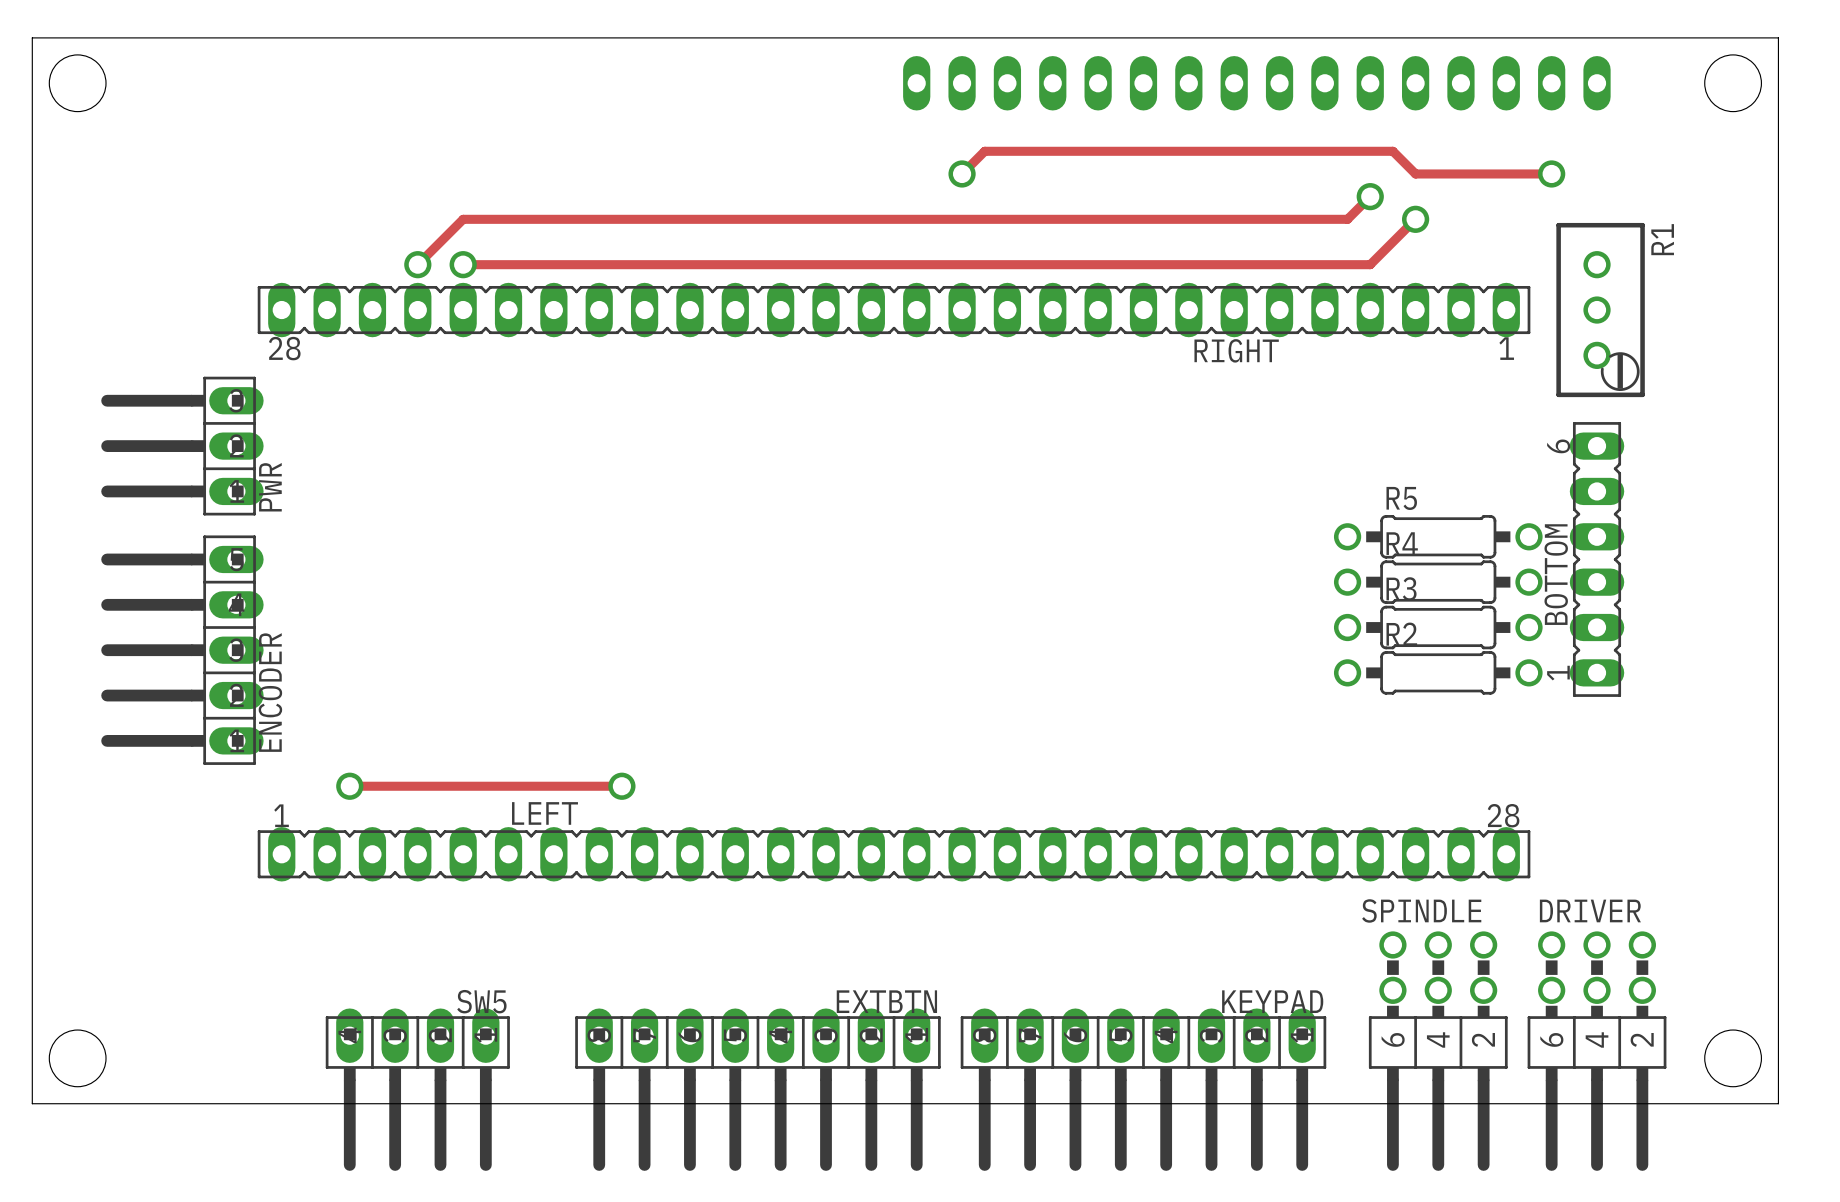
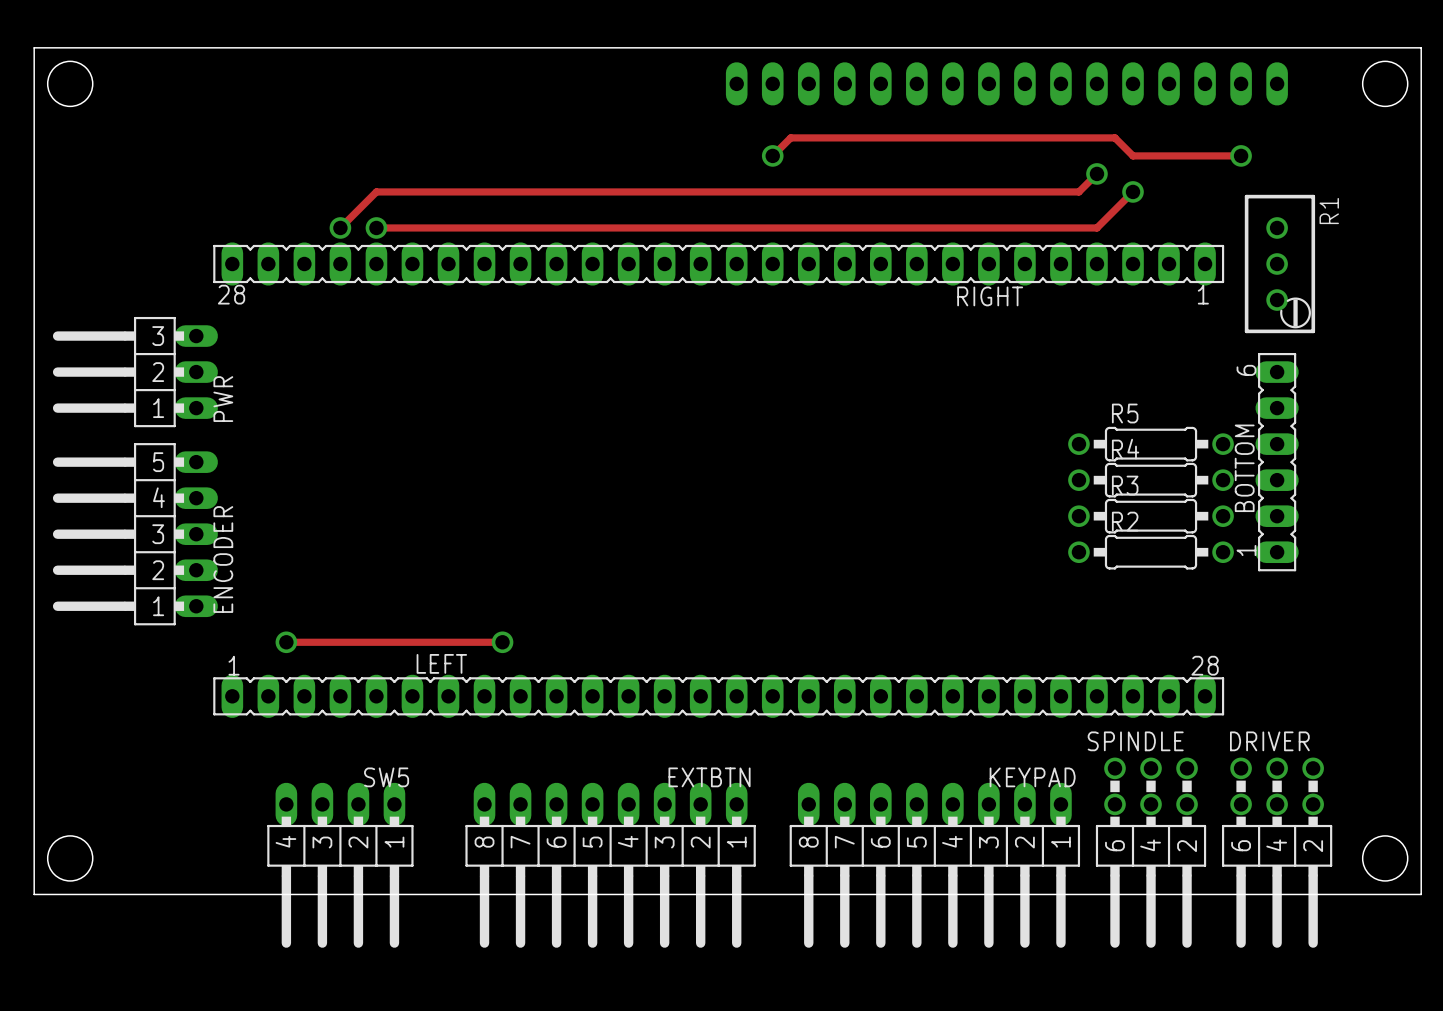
PWR: none -> (135, 372)
PWR: (182, 446) -> none
ENCODER: none -> (135, 534)
ENCODER: (182, 650) -> none
SW5 footprint: [325, 1008, 510, 1171] -> [267, 782, 414, 948]
EXTBTN: none -> (610, 865)
KEYPAD: none -> (934, 865)
EXTBTN: (757, 1089) -> none
KEYPAD: (1143, 1089) -> none

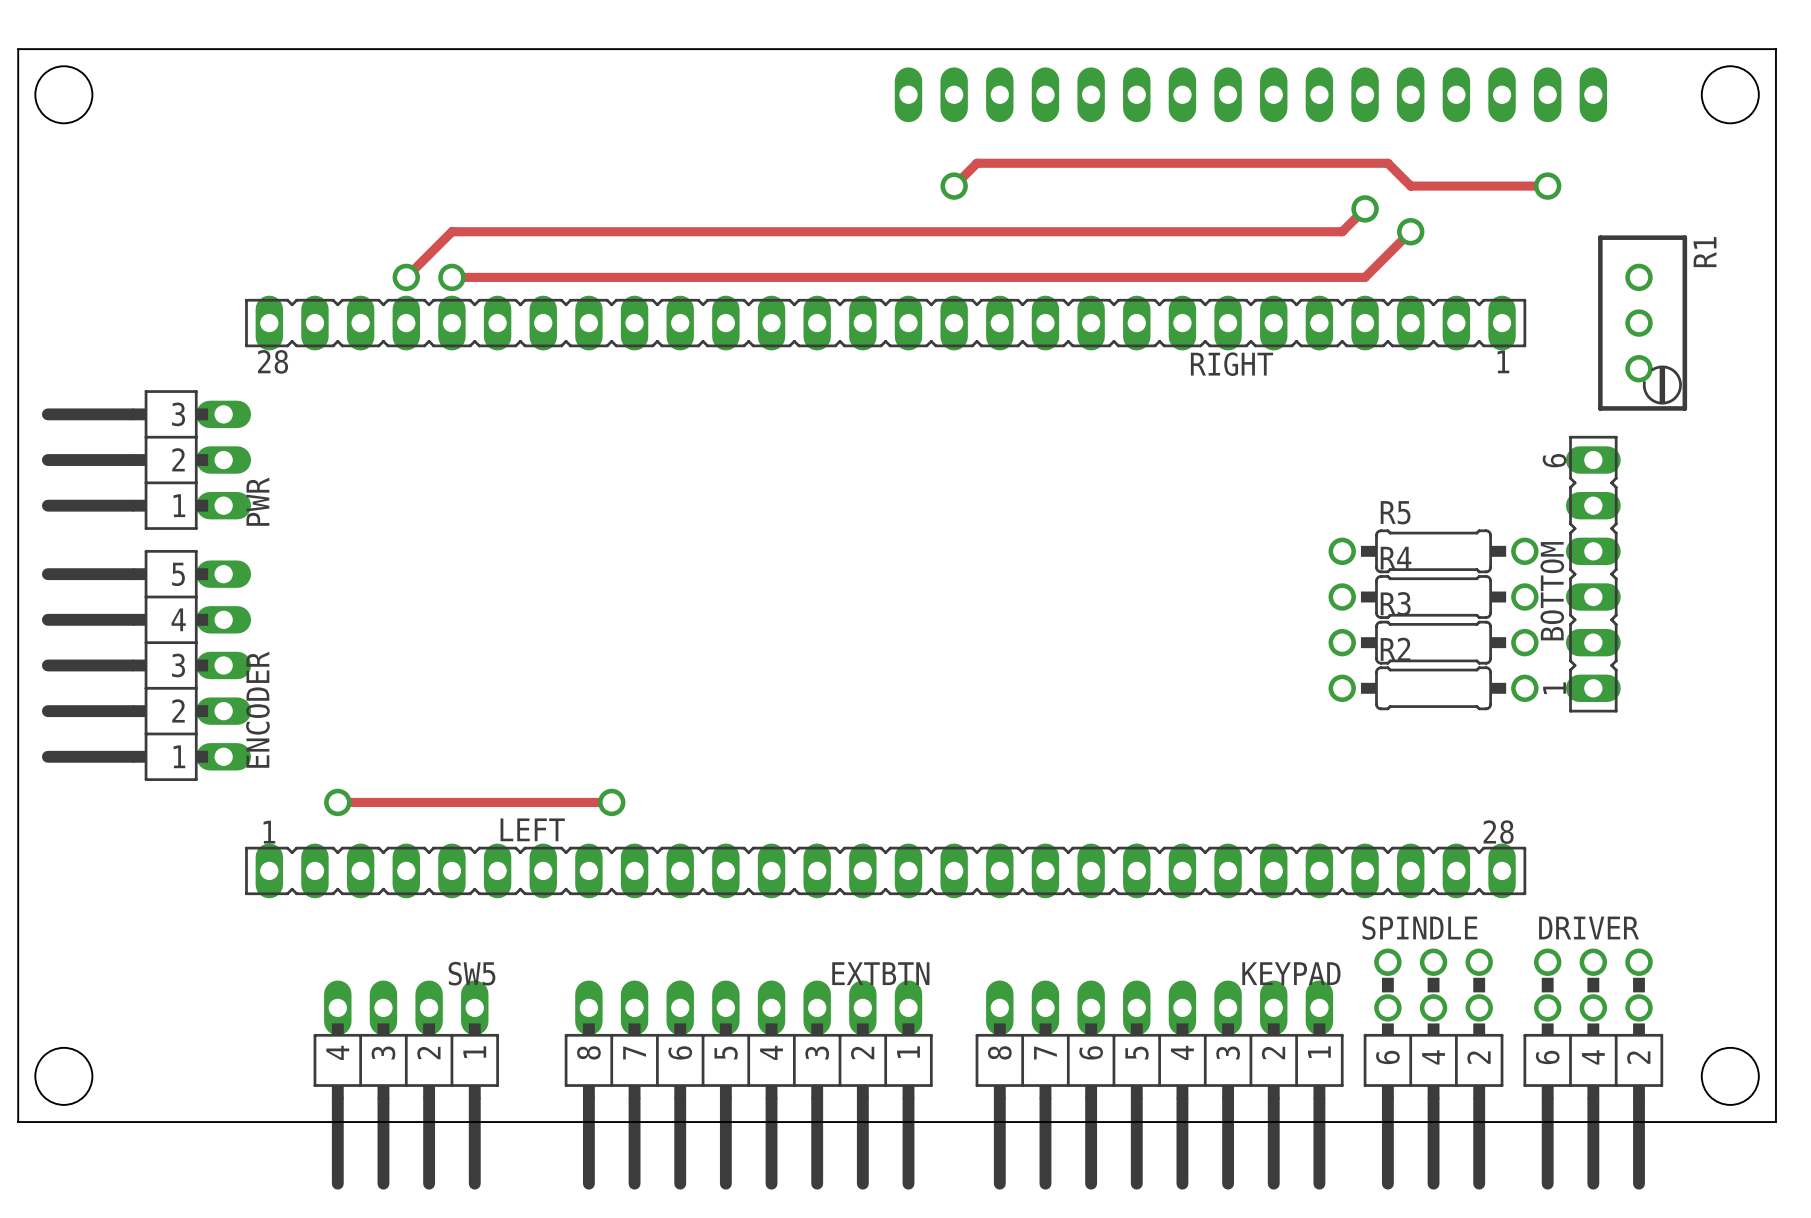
R1 position: (1279, 264) -> (1642, 323)

